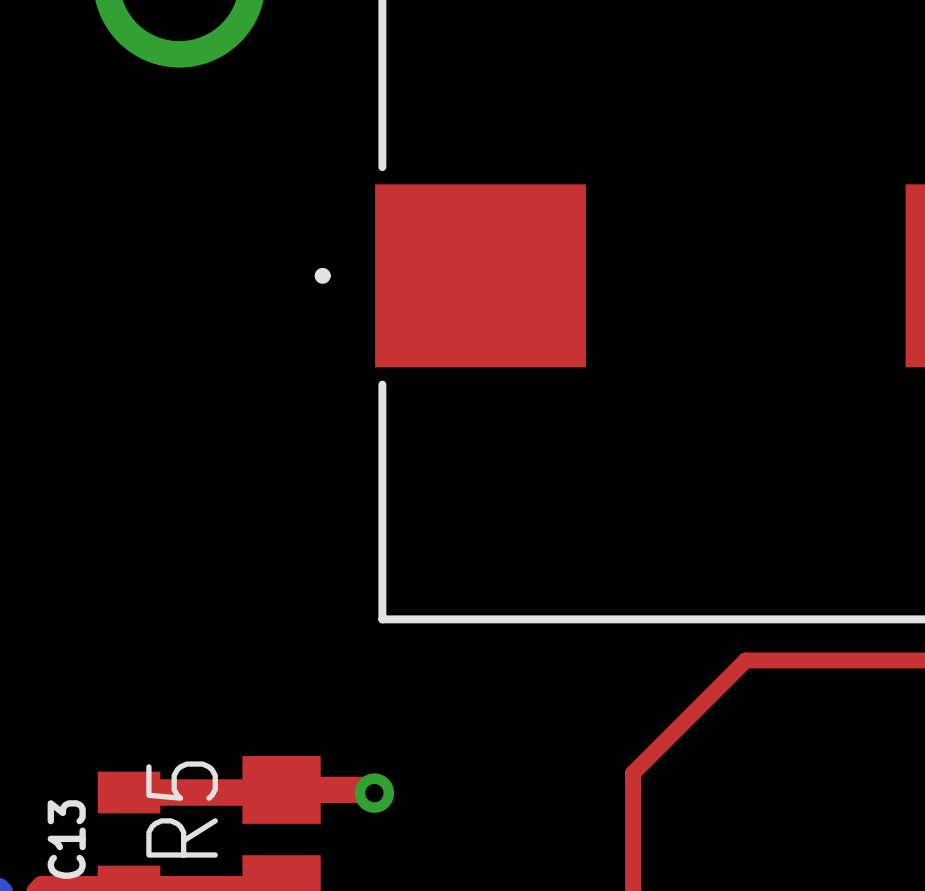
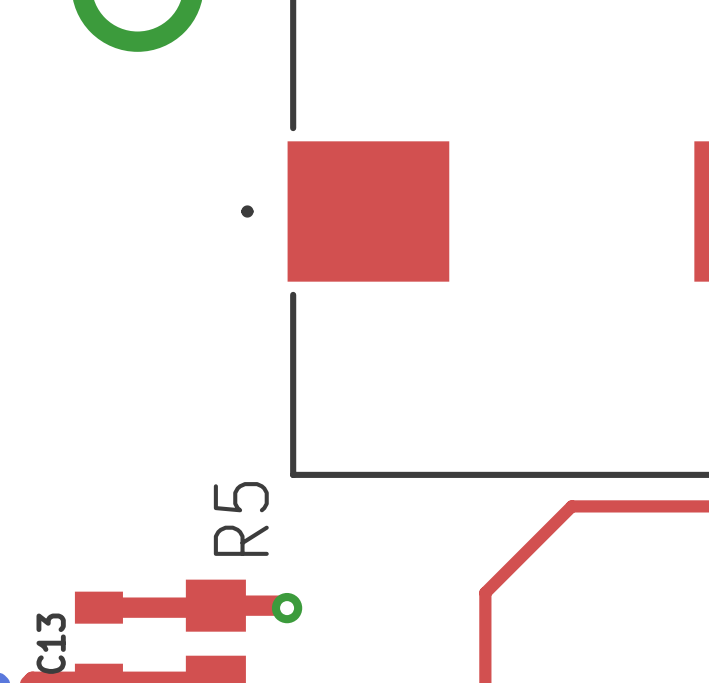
R5 name position: R5 (182, 809) -> R5 (241, 518)

